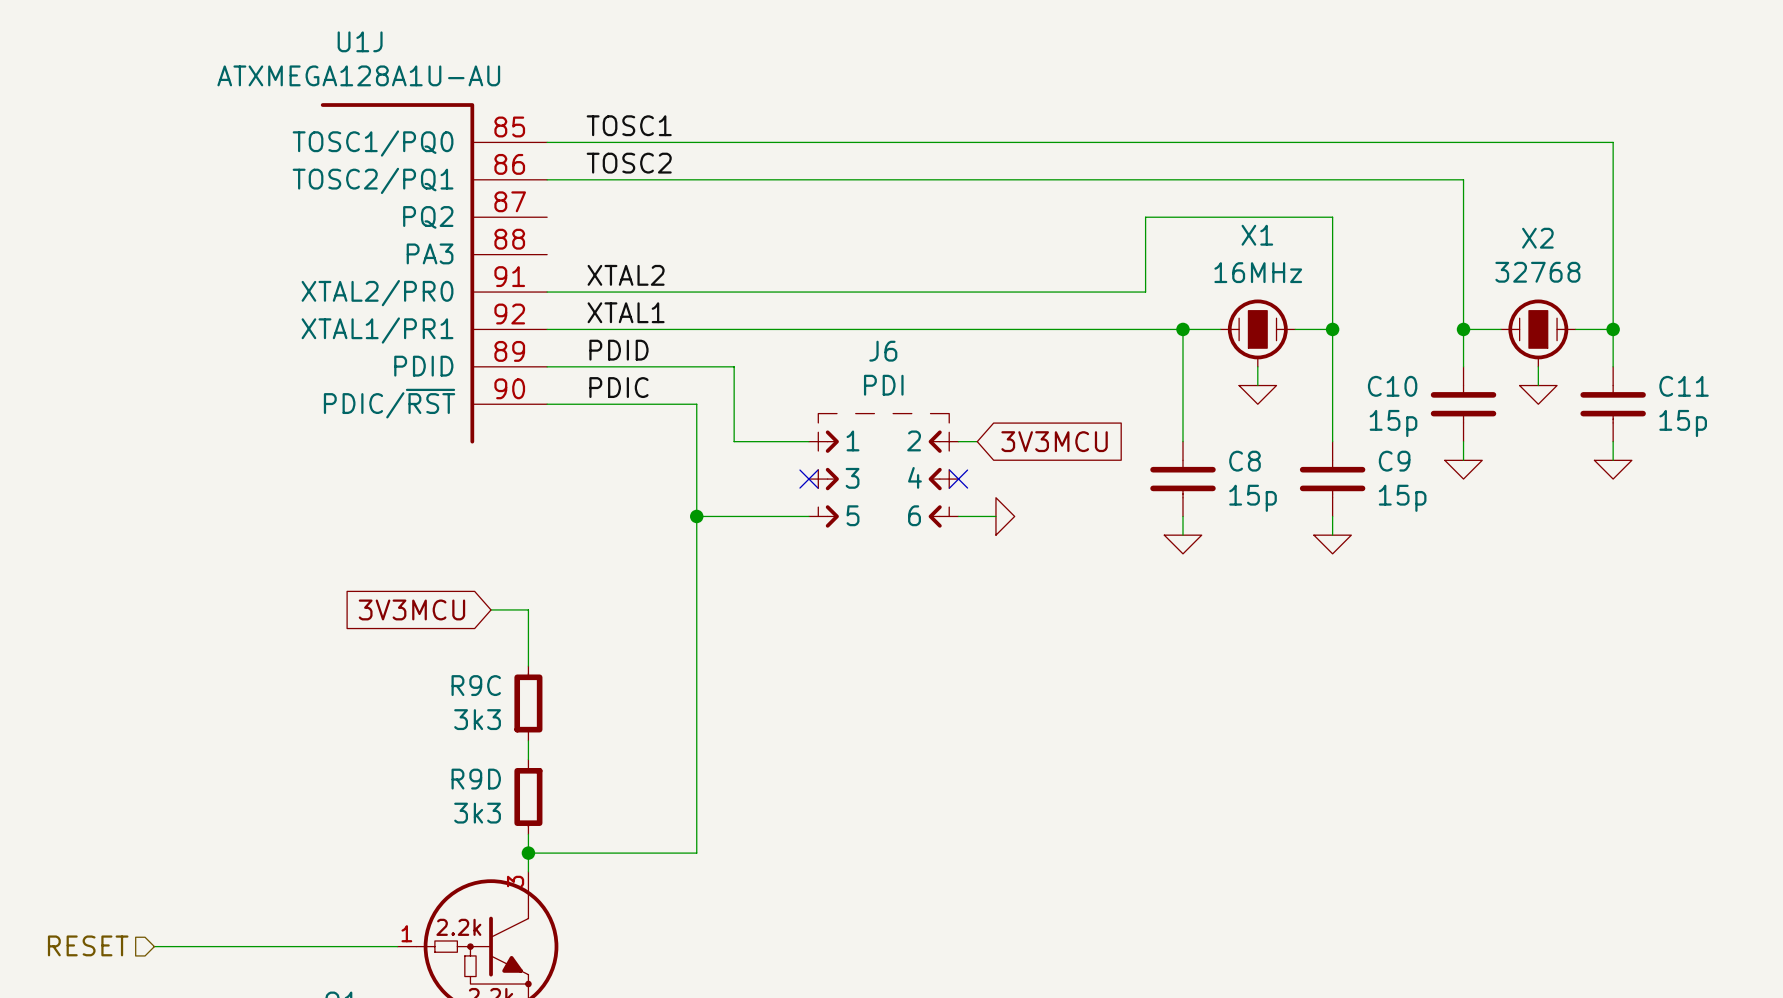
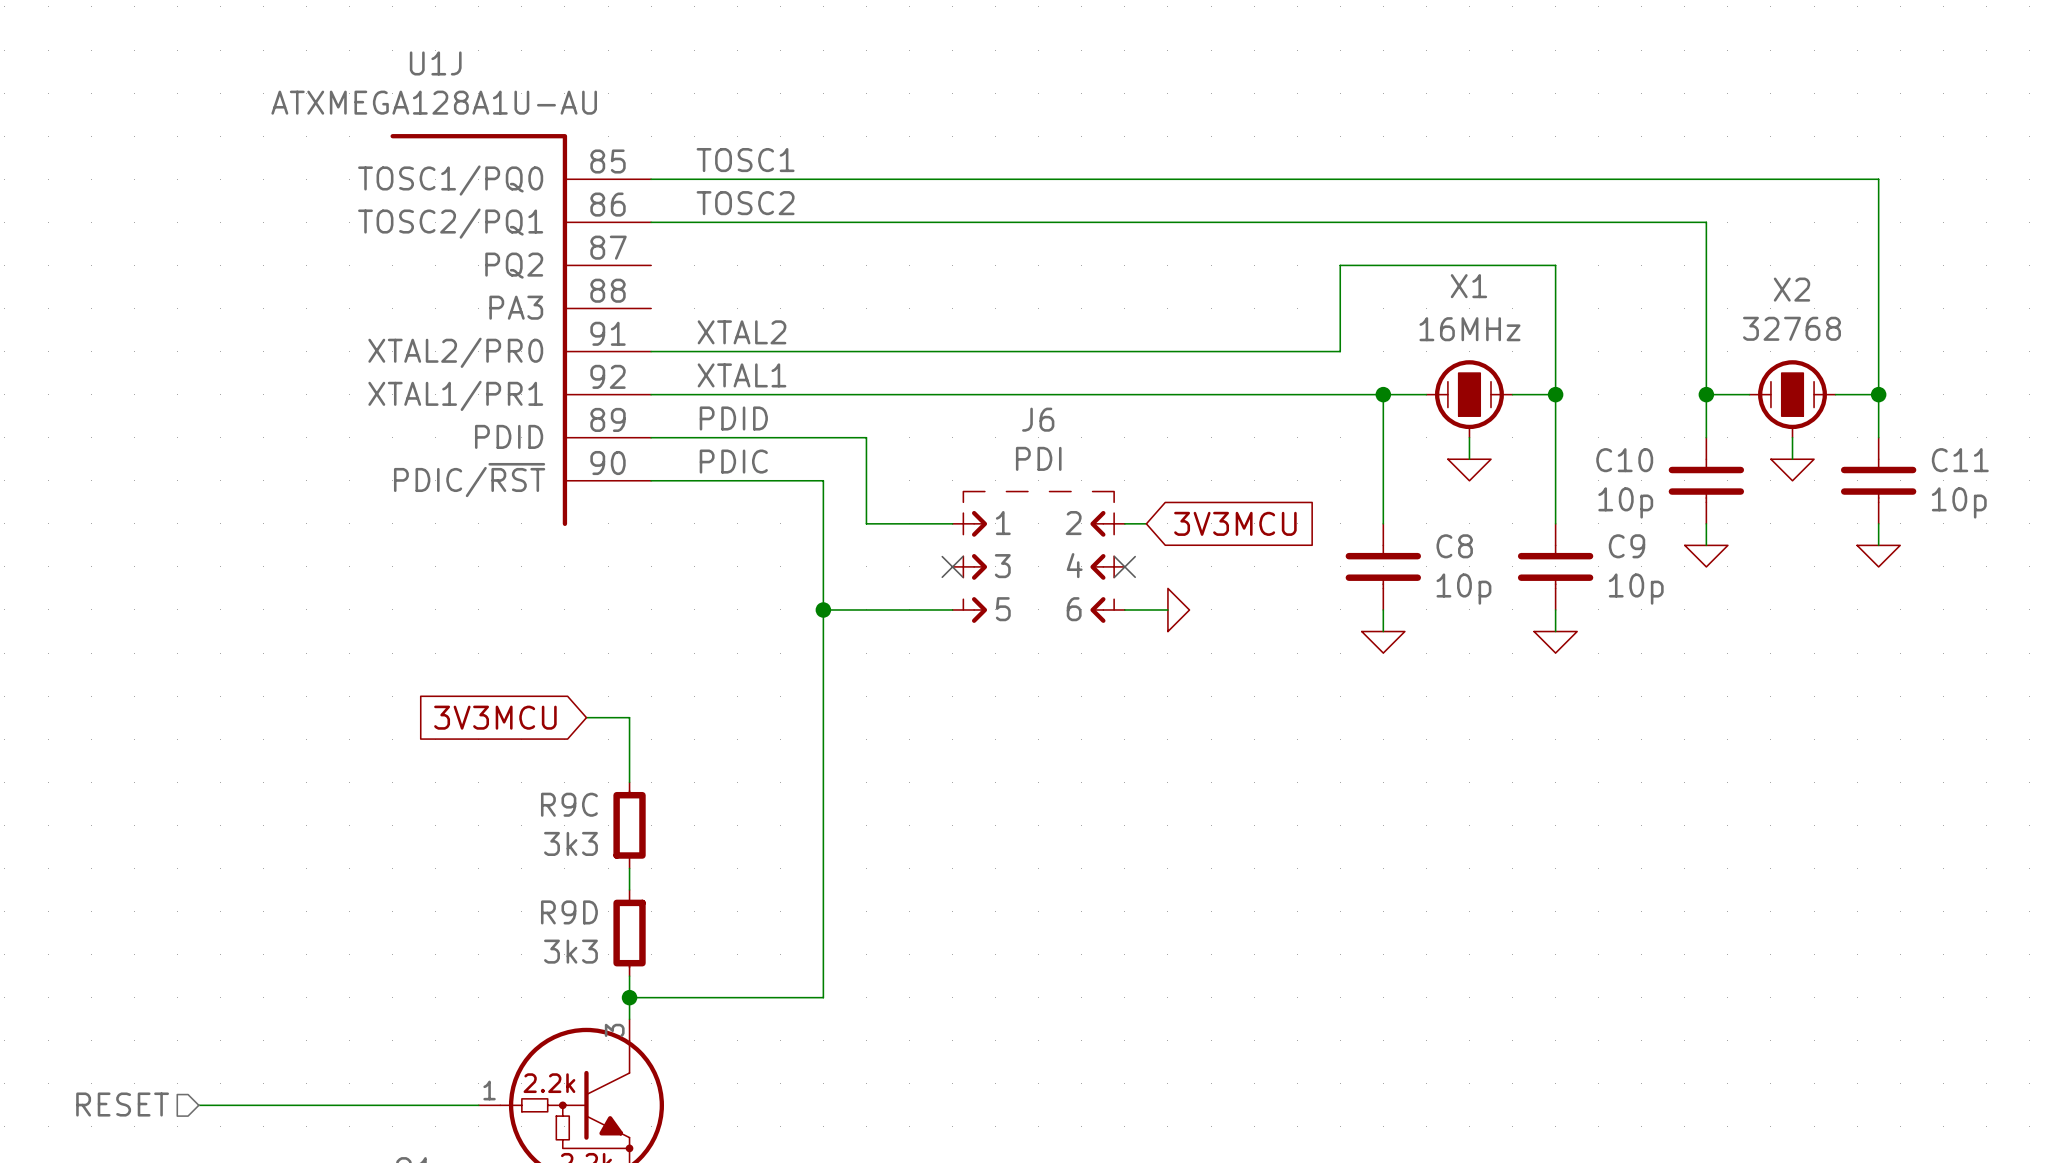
C10 value: 15p (1393, 423) -> 10p (1625, 502)
C11 value: 15p (1683, 423) -> 10p (1959, 502)
C8 value: 15p (1253, 498) -> 10p (1463, 589)
C9 value: 15p (1402, 498) -> 10p (1636, 589)

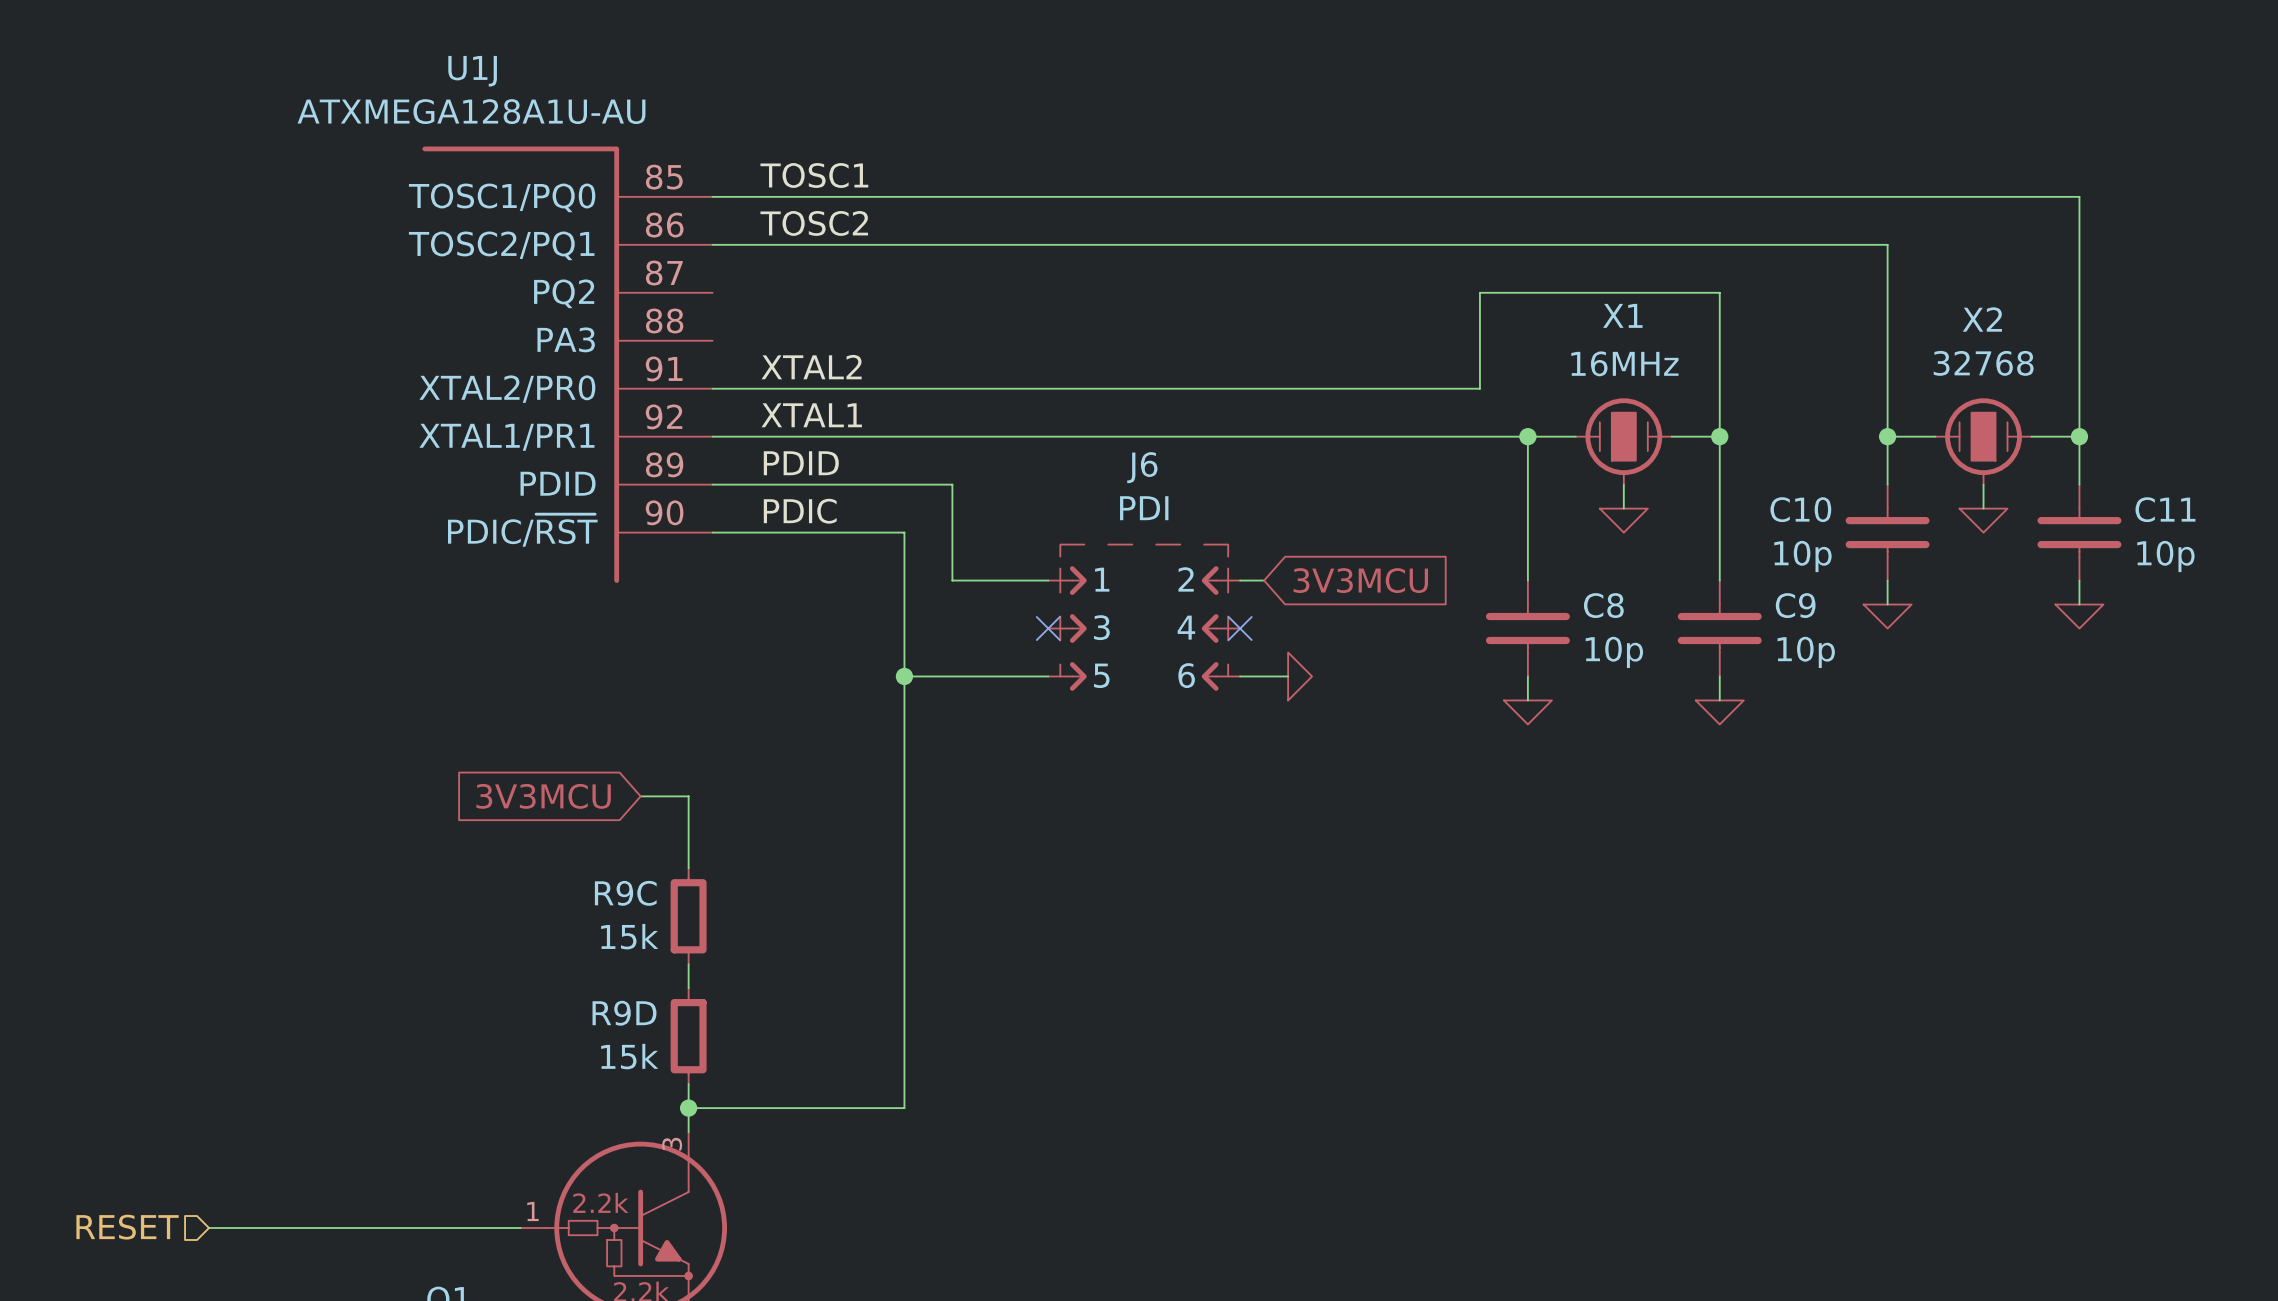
R9C value: 3k3 (570, 843) -> 15k (629, 936)
R9D value: 3k3 (570, 951) -> 15k (629, 1056)

